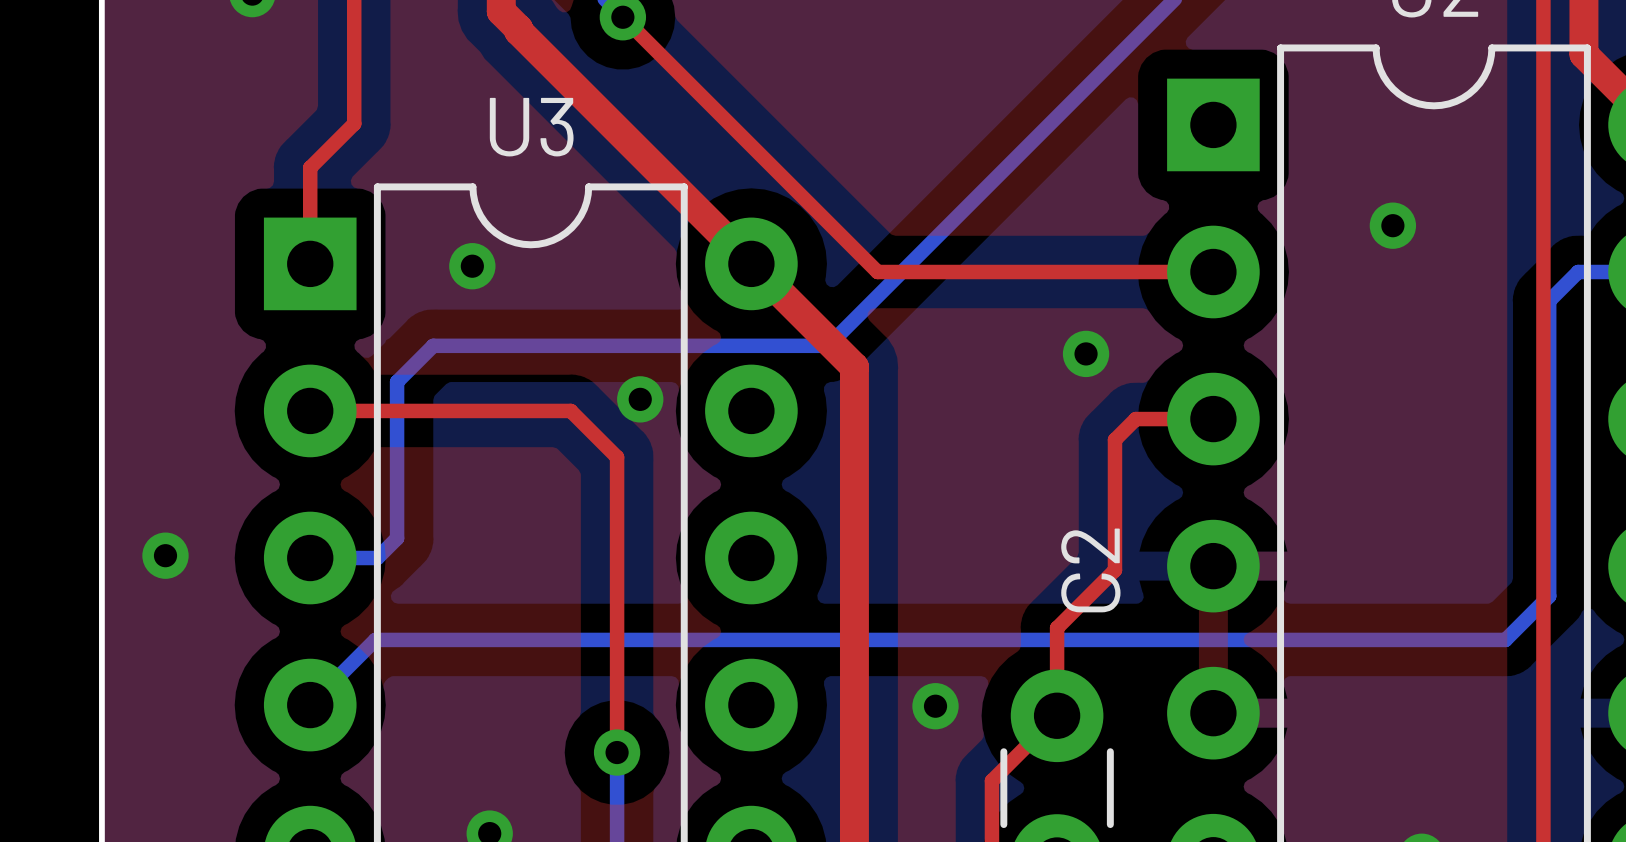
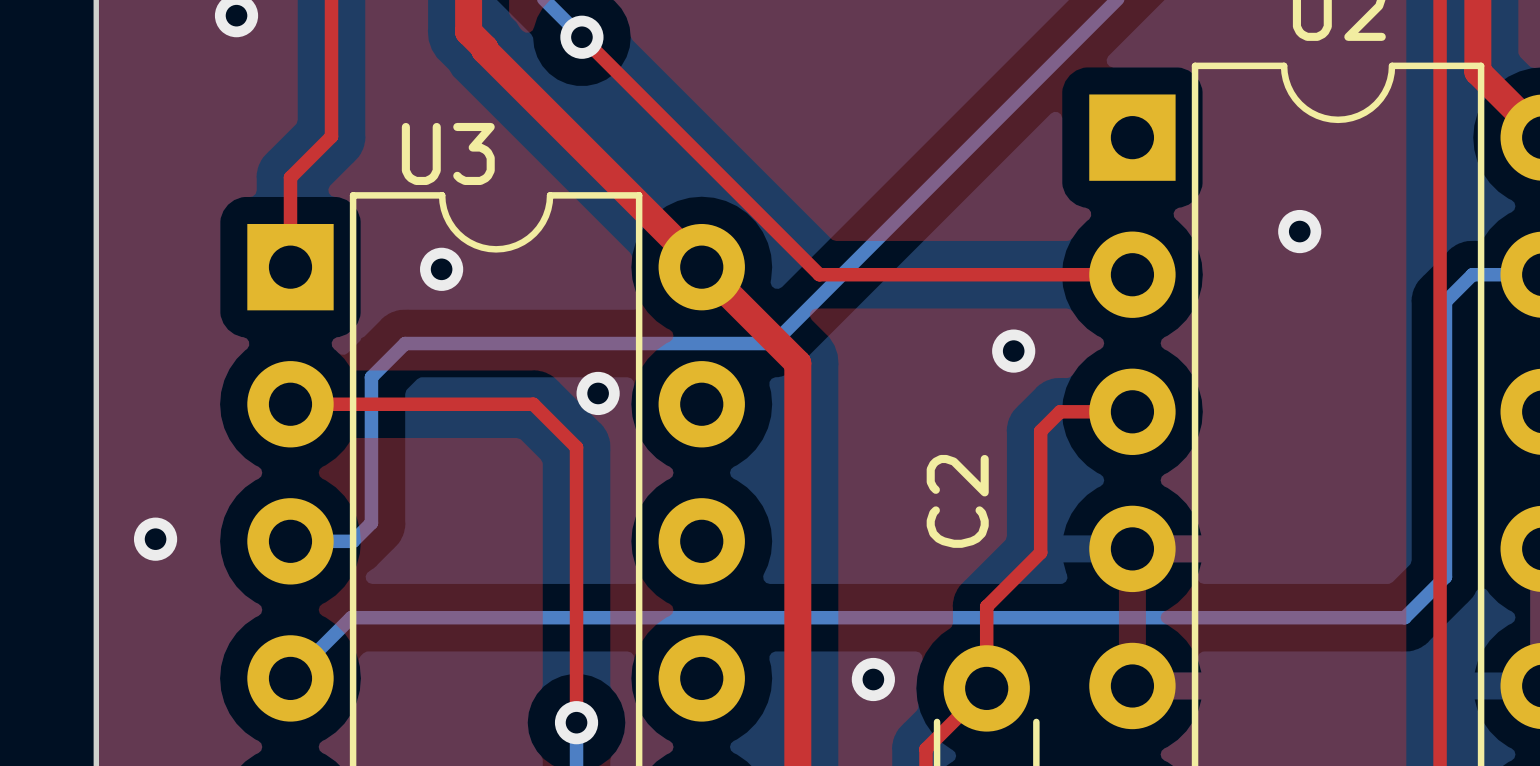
U3 name position: U3 (531, 127) -> U3 (448, 153)
C2 name position: C2 (1090, 570) -> C2 (957, 501)

